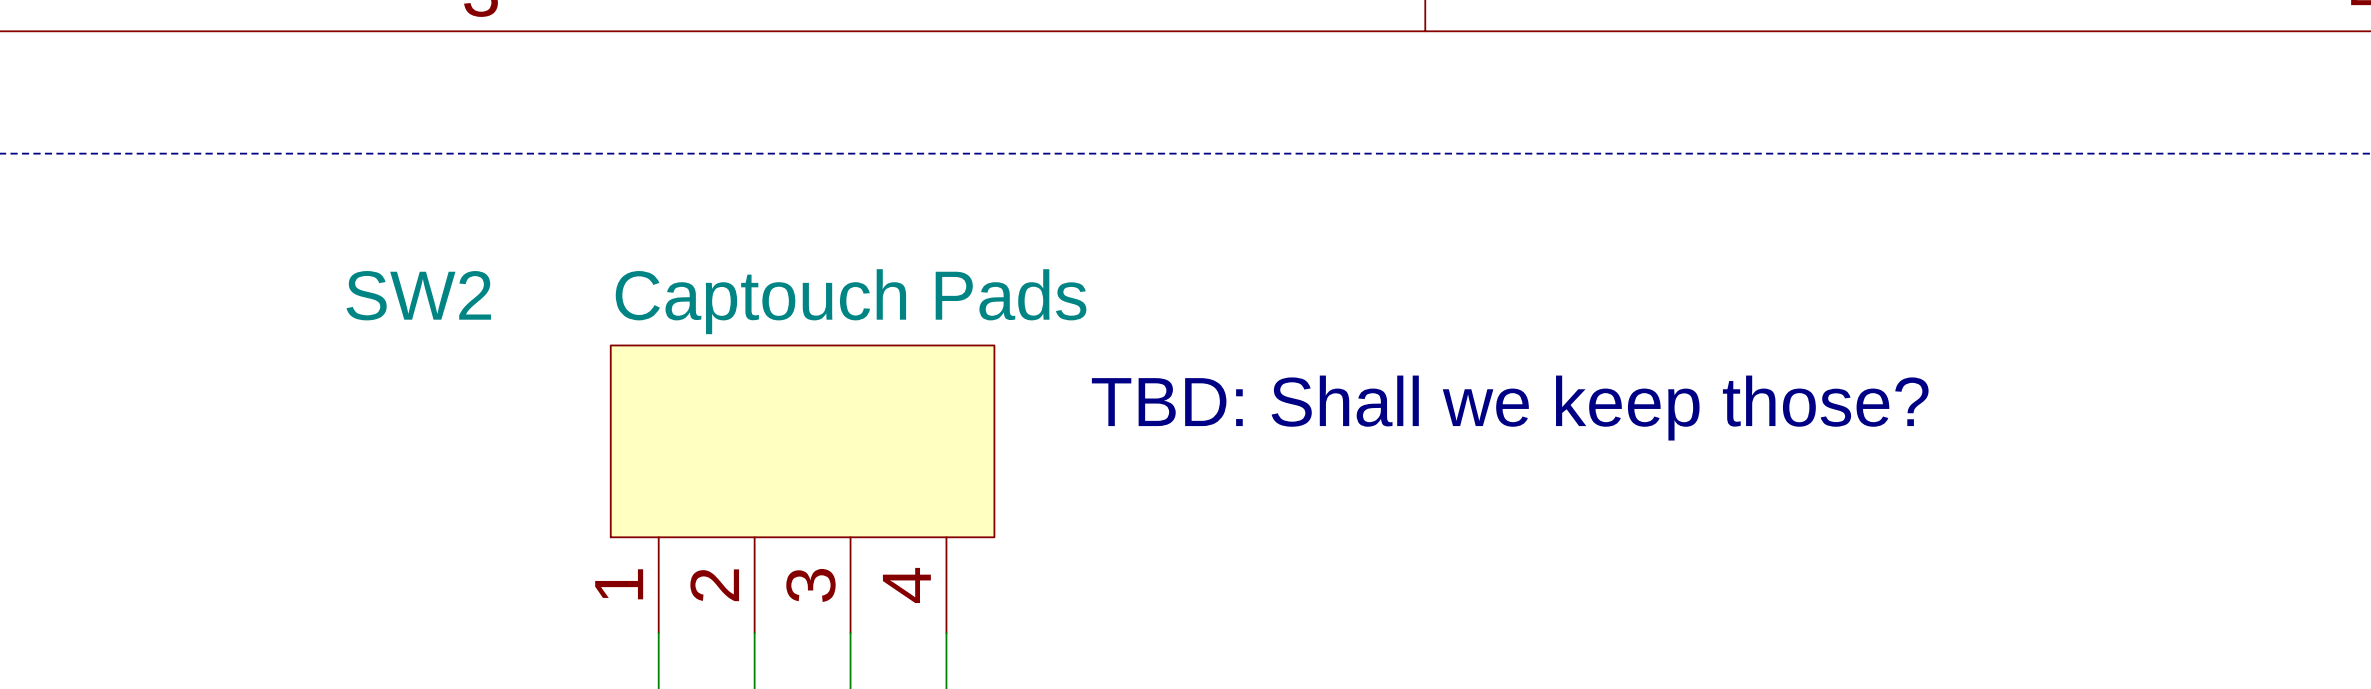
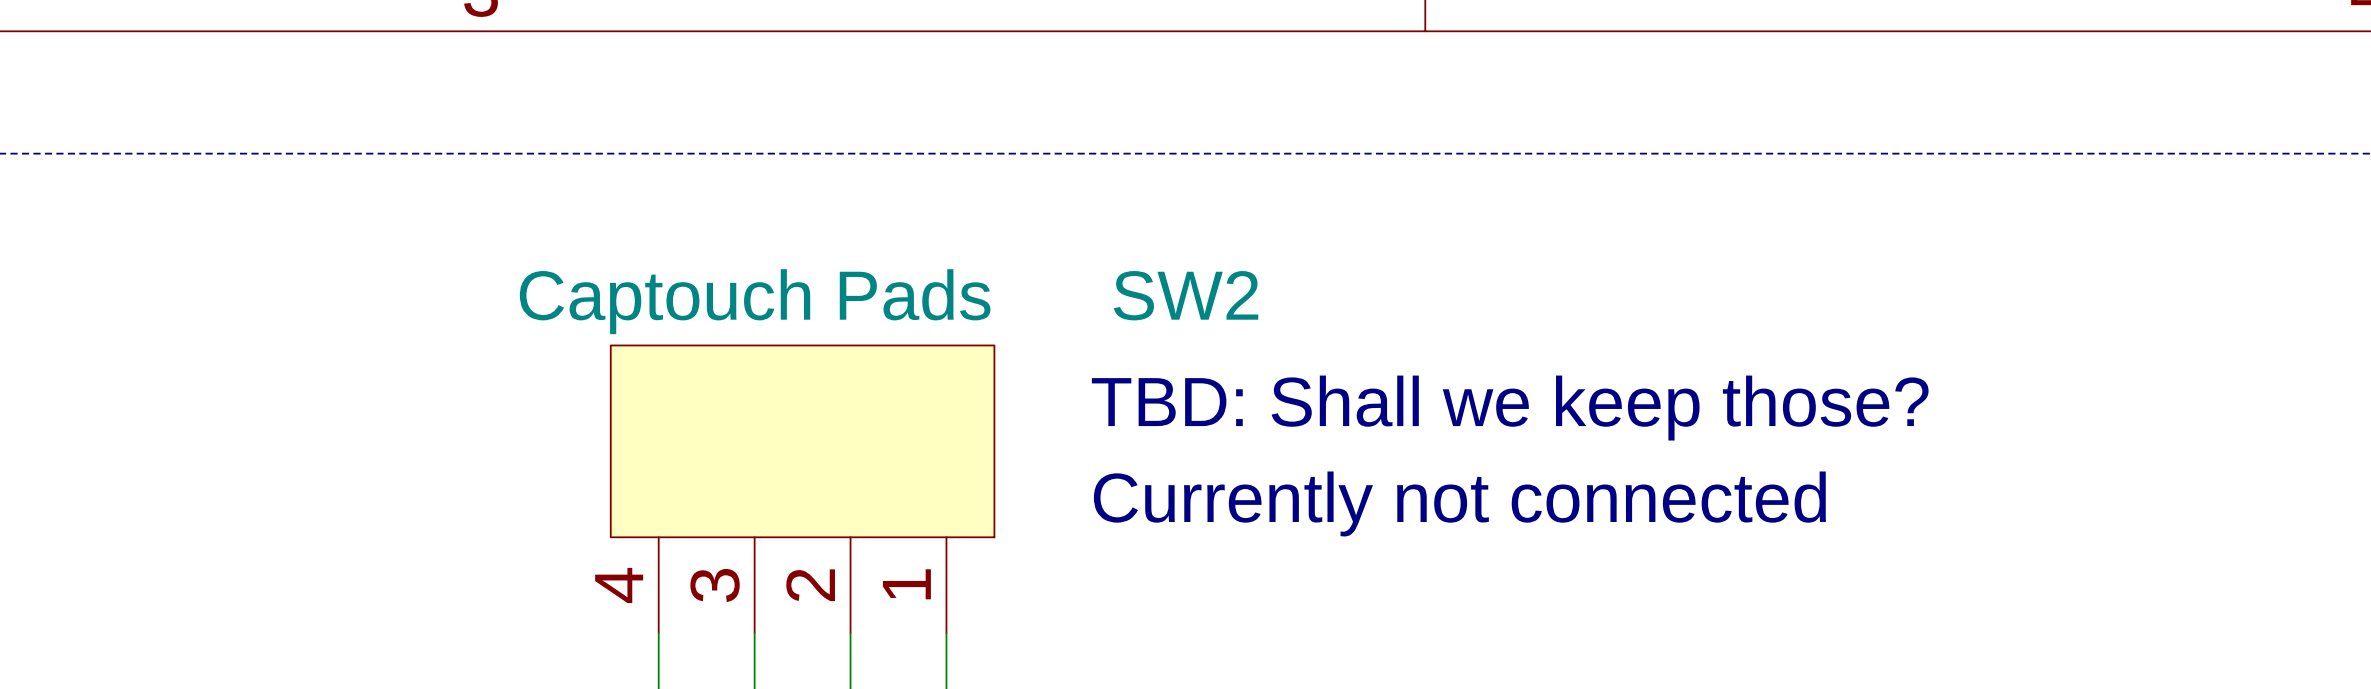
SW2 flip: as is (802, 441) -> left-right (802, 441)
text: none -> Currently not connected (1459, 503)

